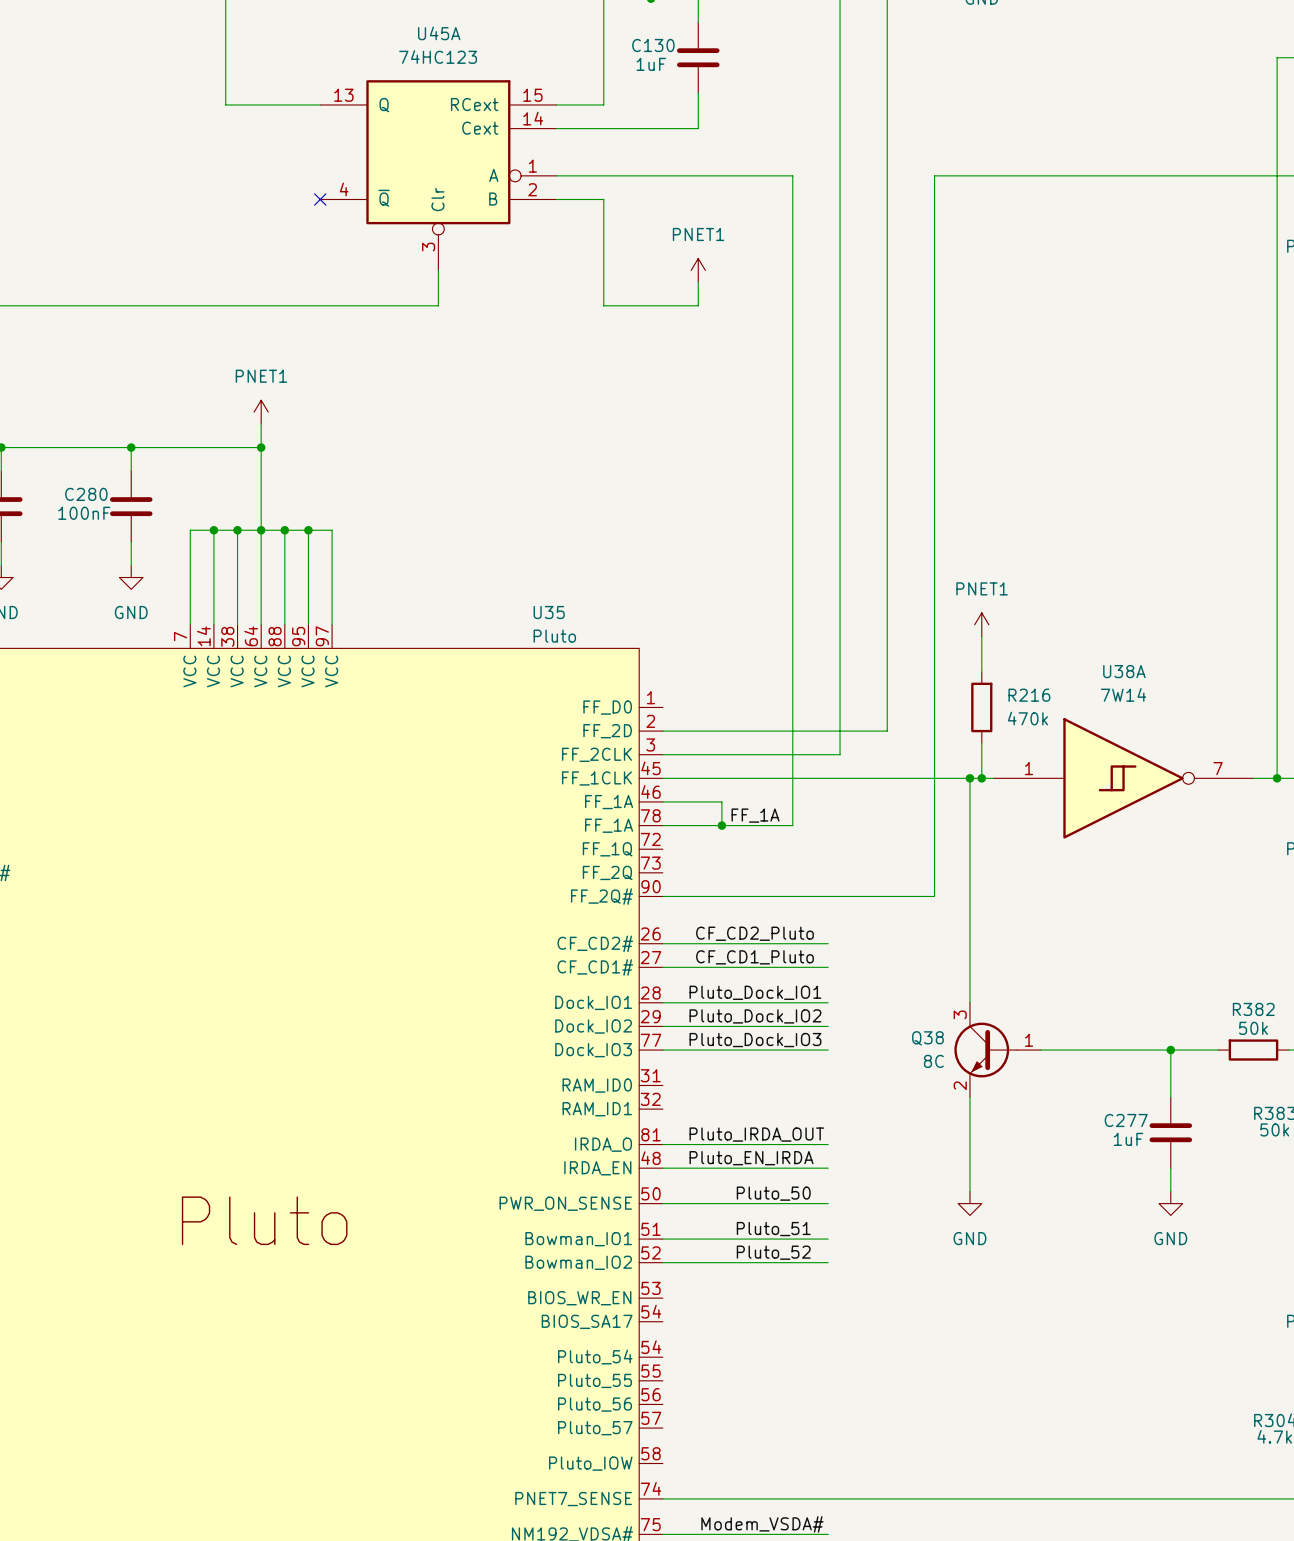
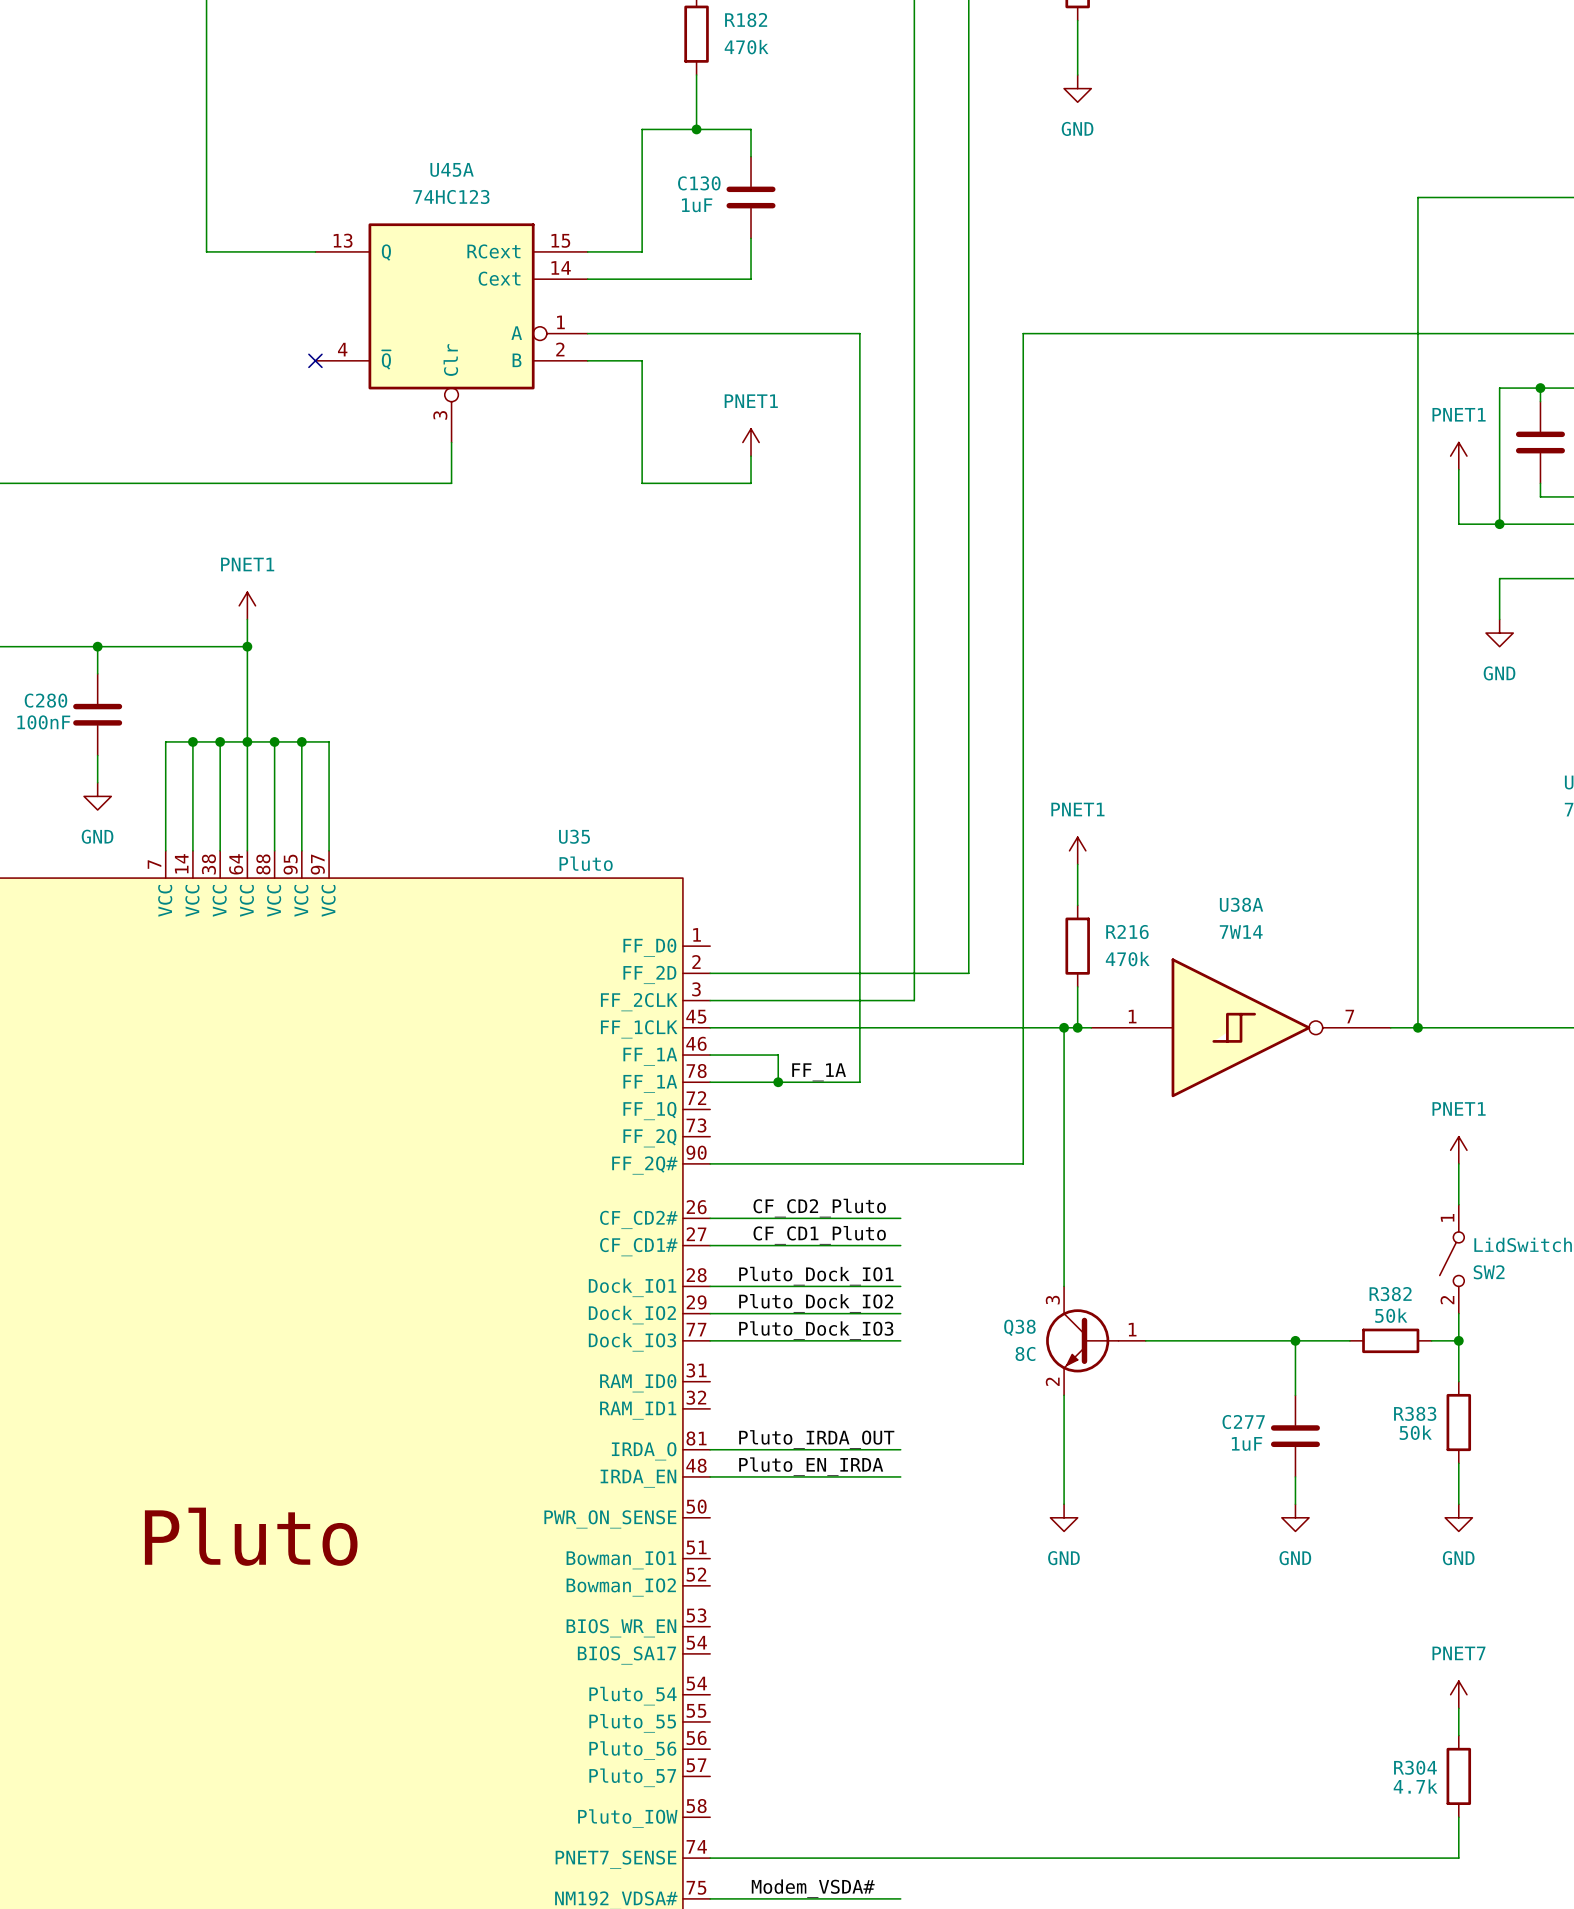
label: Pluto_50 (773, 1193) -> none
wire: (662, 1203) (828, 1203) -> none
label: Pluto_51 (773, 1229) -> none
wire: (662, 1239) (828, 1239) -> none
label: Pluto_52 (773, 1252) -> none
wire: (662, 1262) (828, 1262) -> none

